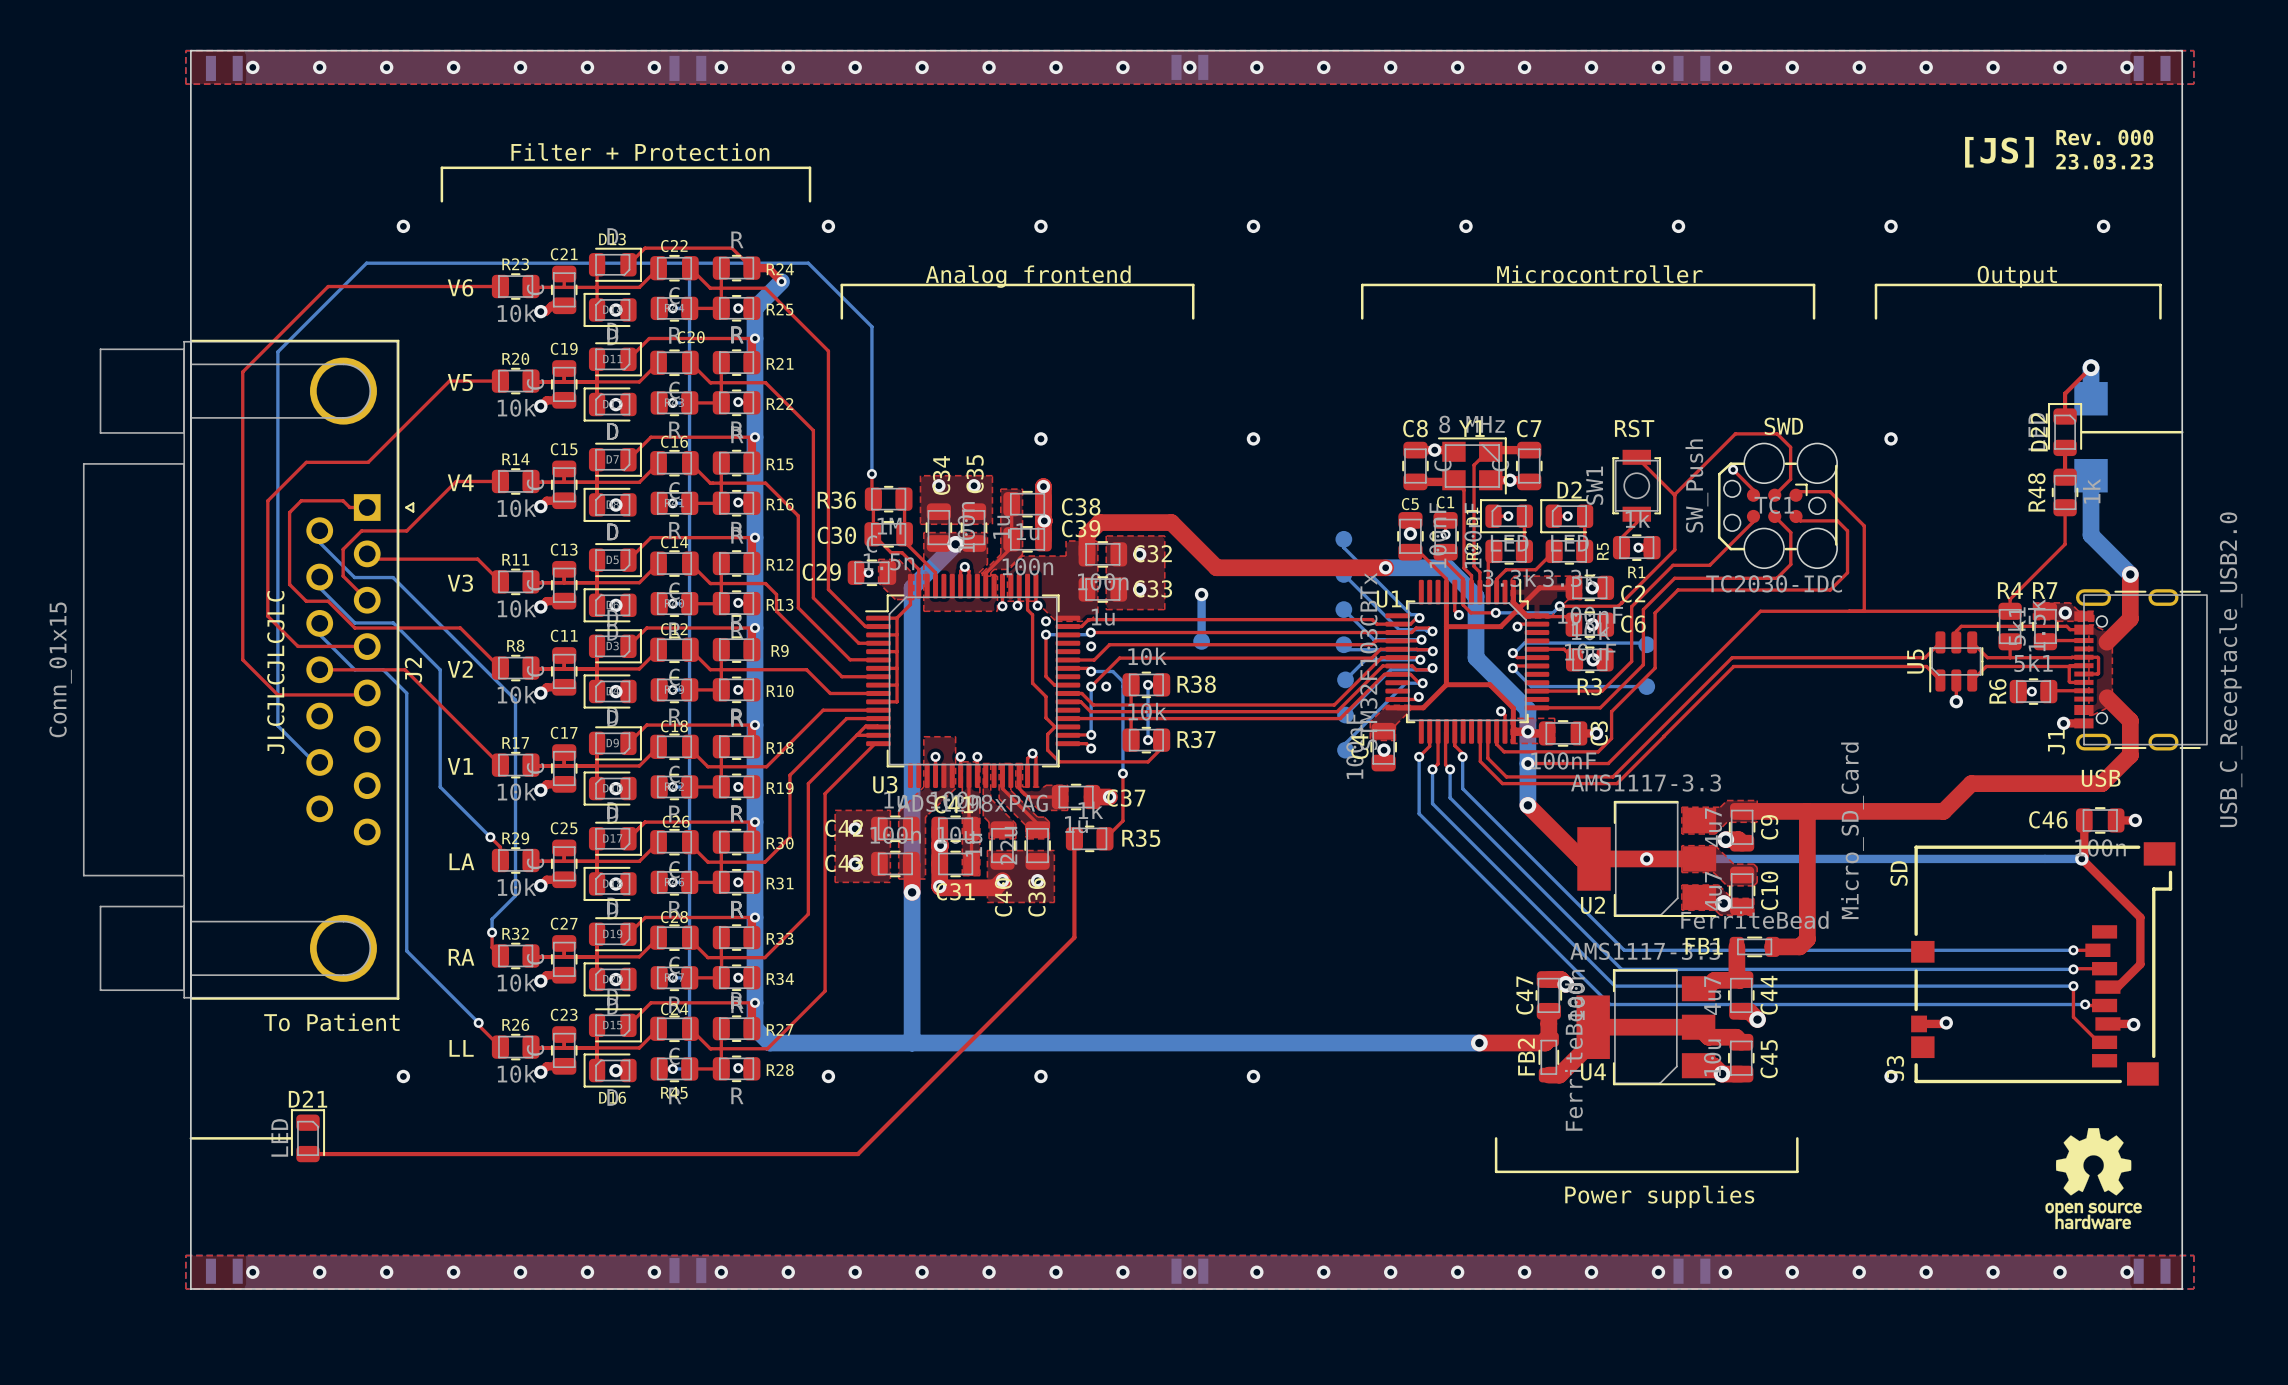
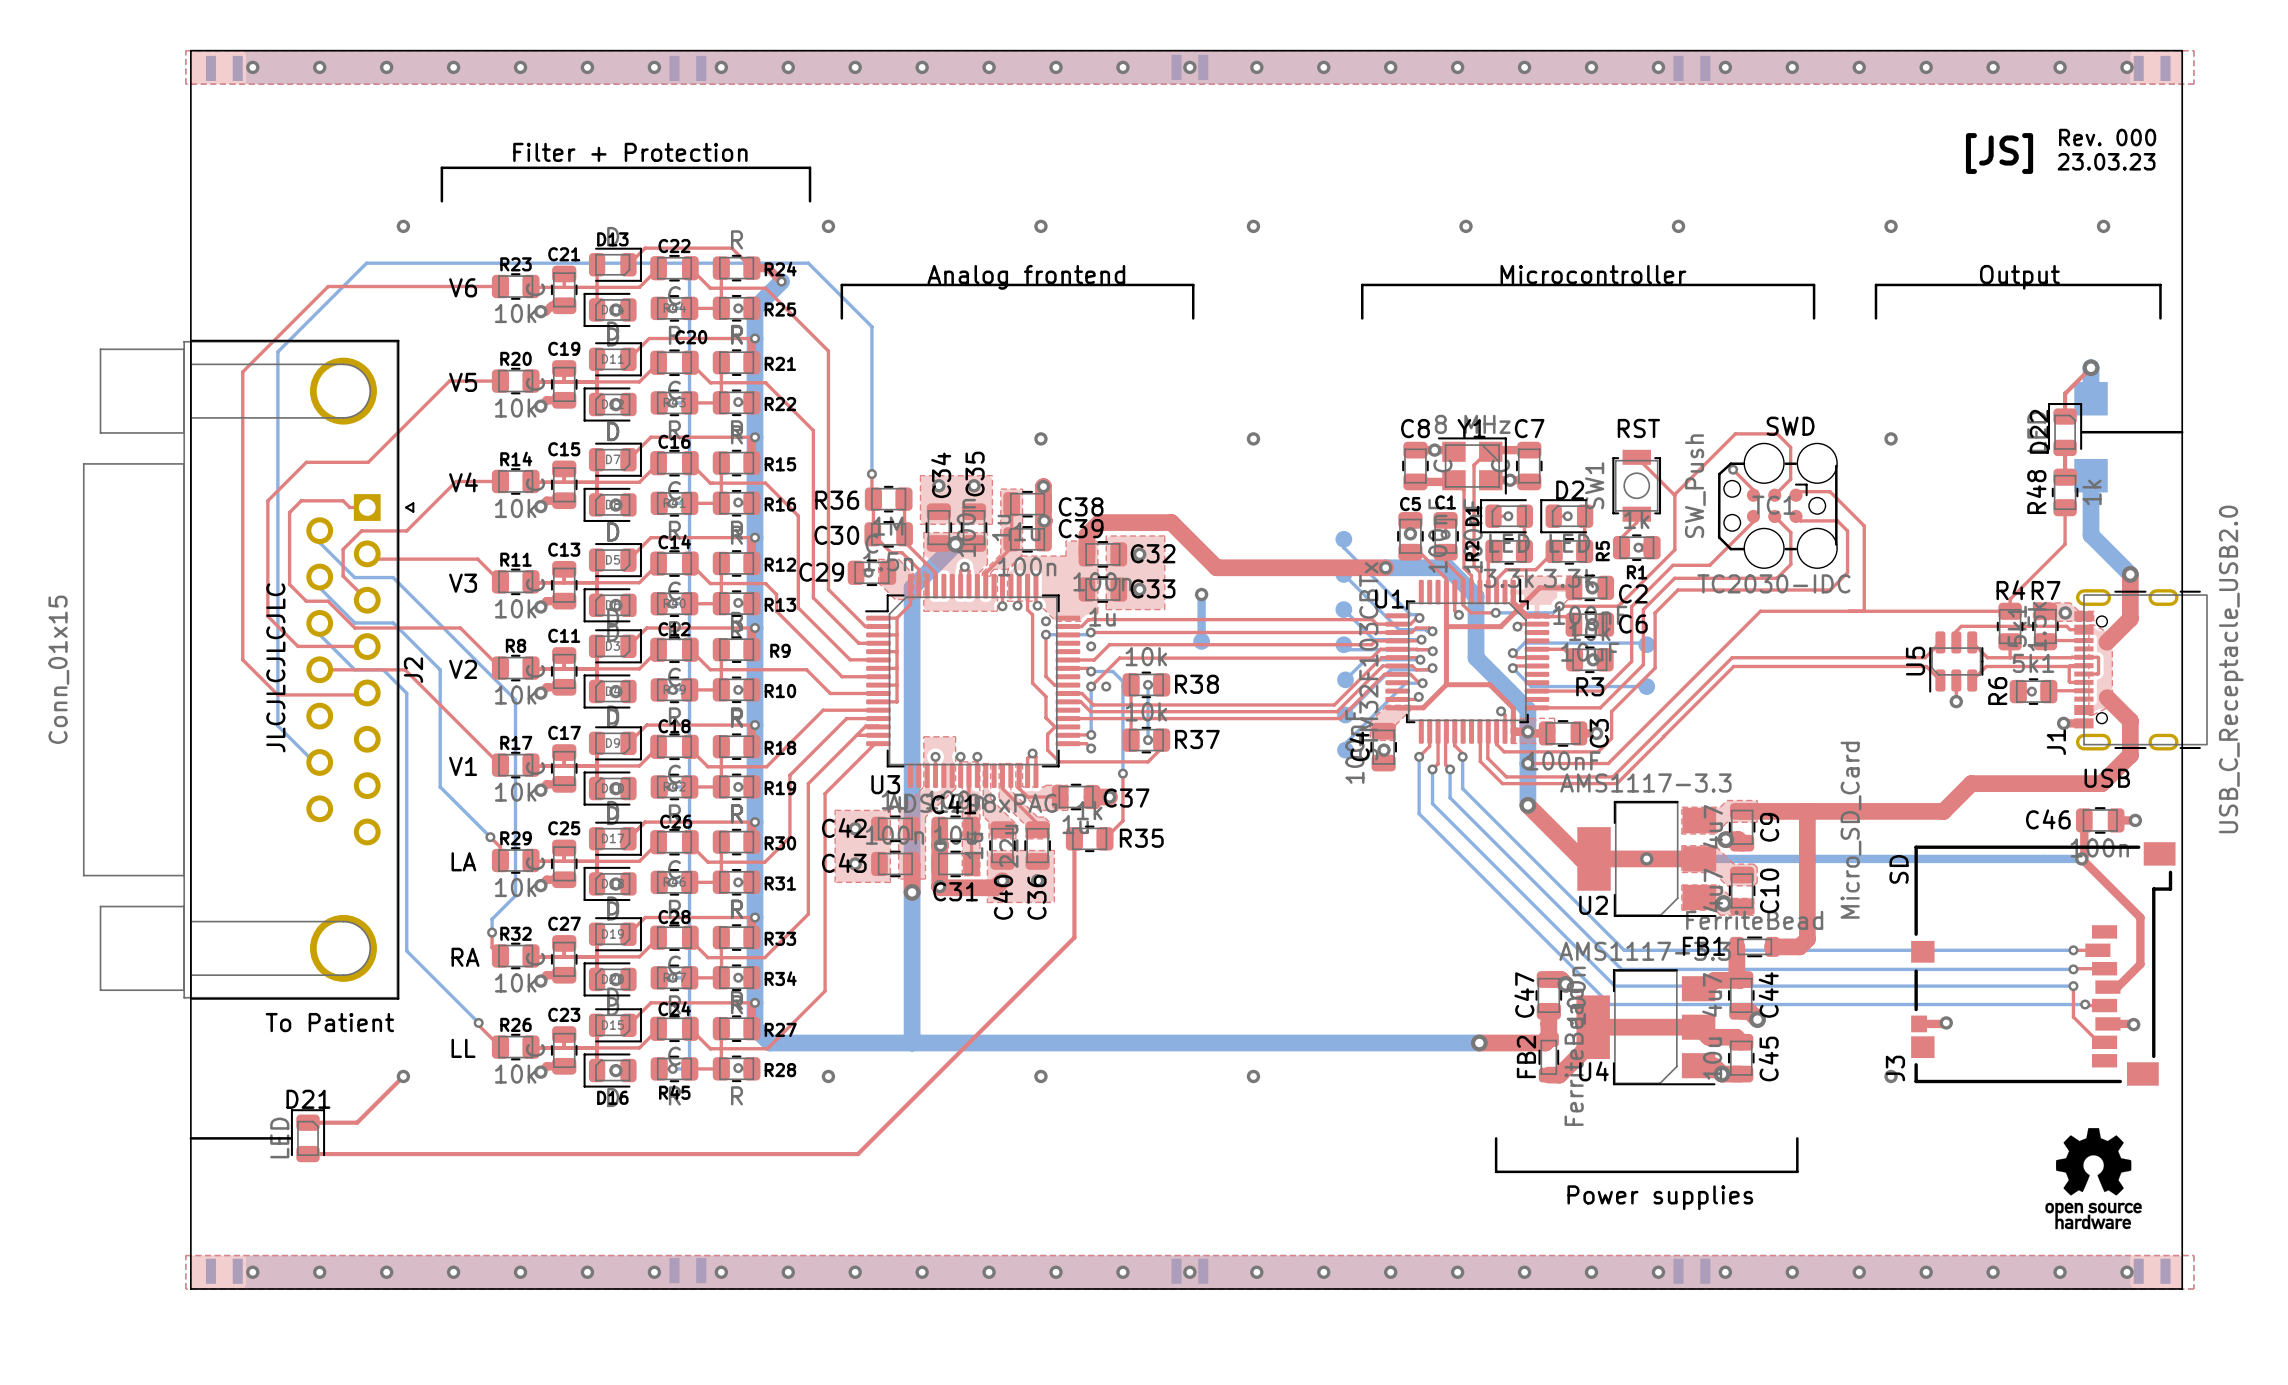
top track: none -> (403, 1076) (357, 1122) (308, 1122)

